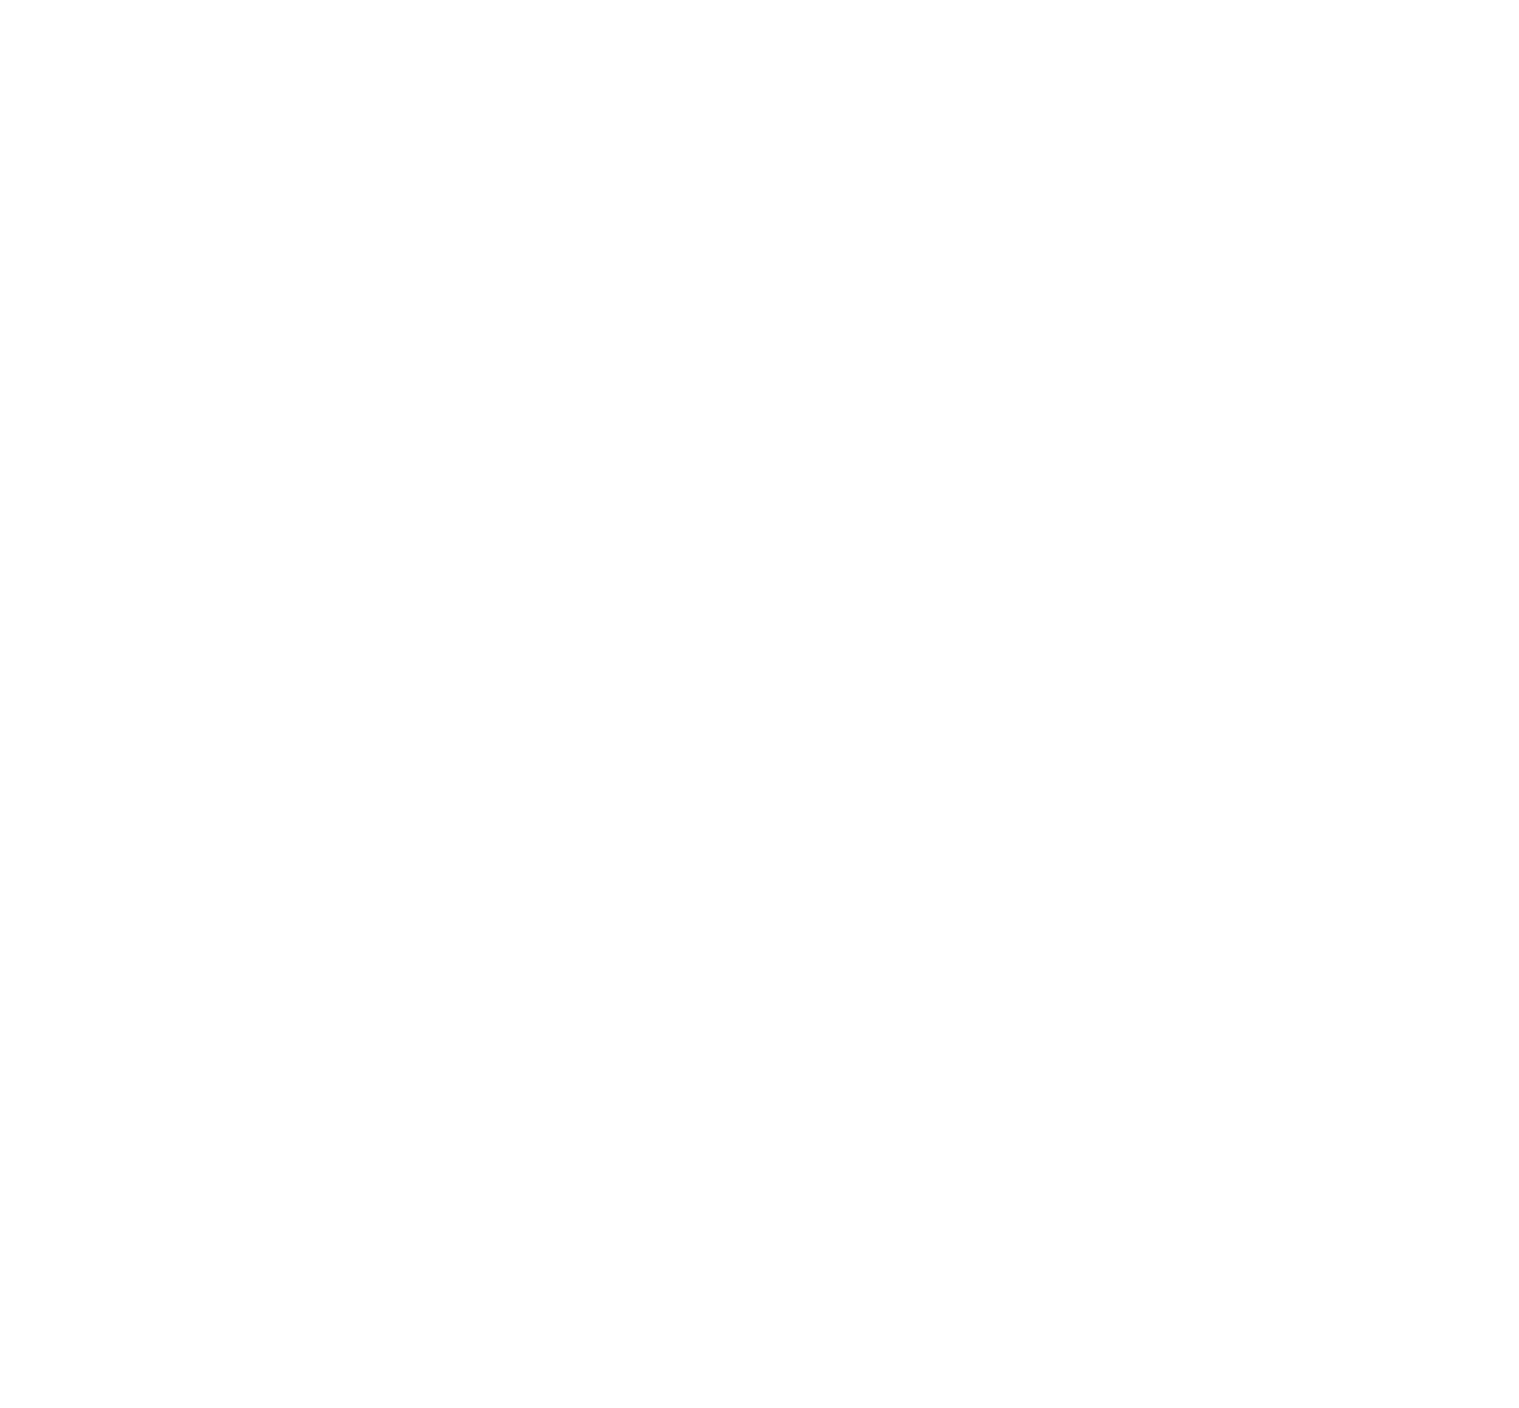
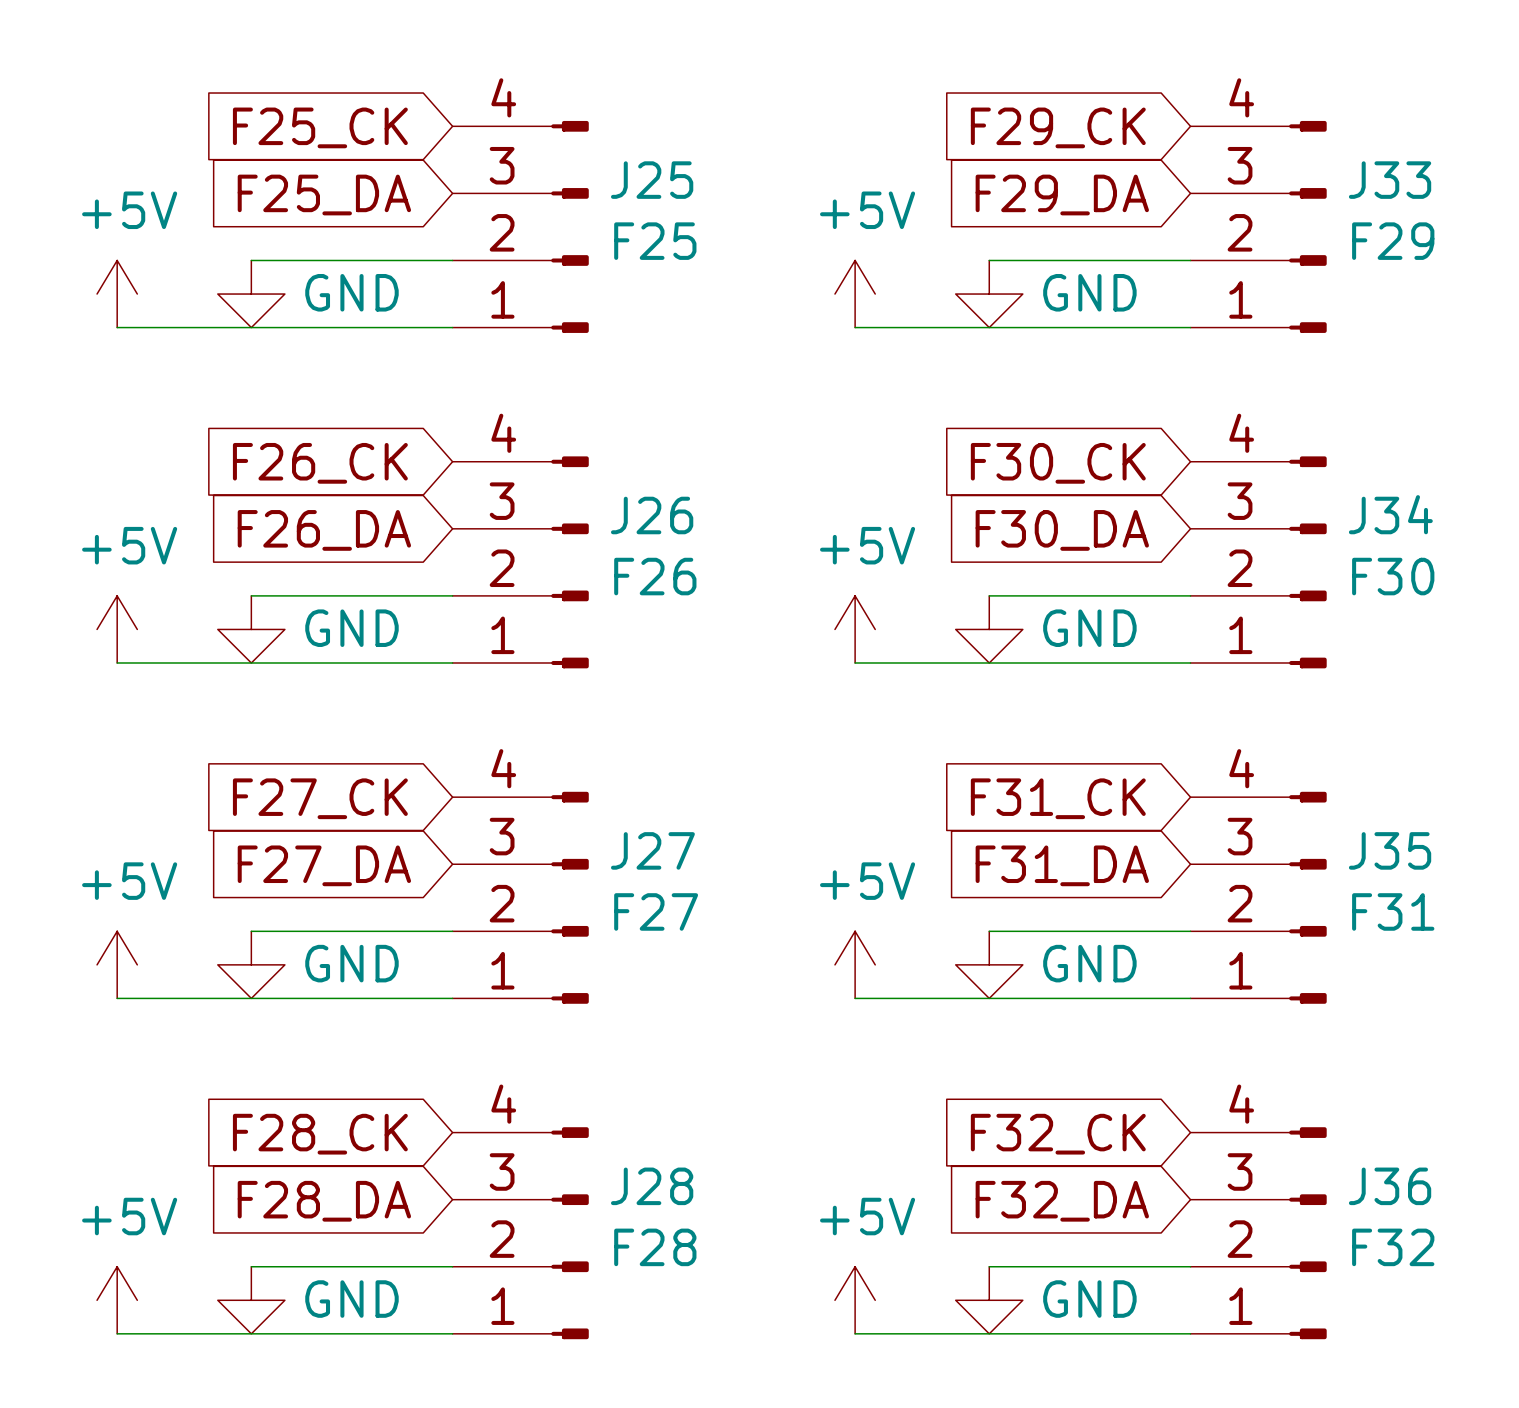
global label: none -> F25_CK (320, 127)
global label: none -> F29_CK (1058, 127)
global label: none -> F25_DA (324, 195)
global label: none -> F29_DA (1062, 195)
J25: none -> F25 (520, 226)
J33: none -> F29 (1258, 226)
wire: none -> (251, 260) (452, 260)
wire: none -> (989, 260) (1190, 260)
power symbol: none -> +5V (117, 294)
power symbol: none -> GND (251, 294)
power symbol: none -> +5V (855, 294)
power symbol: none -> GND (989, 294)
wire: none -> (117, 327) (452, 327)
wire: none -> (855, 327) (1190, 327)
global label: none -> F26_CK (320, 463)
global label: none -> F30_CK (1058, 463)
global label: none -> F26_DA (324, 530)
global label: none -> F30_DA (1062, 530)
J26: none -> F26 (520, 562)
J34: none -> F30 (1258, 562)
wire: none -> (251, 595) (452, 595)
wire: none -> (989, 595) (1190, 595)
power symbol: none -> +5V (117, 629)
power symbol: none -> GND (251, 629)
power symbol: none -> +5V (855, 629)
power symbol: none -> GND (989, 629)
wire: none -> (117, 662) (452, 662)
wire: none -> (855, 662) (1190, 662)
global label: none -> F27_CK (320, 798)
global label: none -> F31_CK (1058, 798)
global label: none -> F27_DA (324, 865)
global label: none -> F31_DA (1062, 865)
J27: none -> F27 (520, 897)
J35: none -> F31 (1258, 897)
wire: none -> (251, 931) (452, 931)
wire: none -> (989, 931) (1190, 931)
power symbol: none -> +5V (117, 964)
power symbol: none -> GND (251, 964)
power symbol: none -> +5V (855, 964)
power symbol: none -> GND (989, 964)
wire: none -> (117, 998) (452, 998)
wire: none -> (855, 998) (1190, 998)
global label: none -> F28_CK (320, 1134)
global label: none -> F32_CK (1058, 1134)
global label: none -> F28_DA (324, 1201)
global label: none -> F32_DA (1062, 1201)
J28: none -> F28 (520, 1233)
J36: none -> F32 (1258, 1233)
wire: none -> (251, 1266) (452, 1266)
wire: none -> (989, 1266) (1190, 1266)
power symbol: none -> +5V (117, 1300)
power symbol: none -> GND (251, 1300)
power symbol: none -> +5V (855, 1300)
power symbol: none -> GND (989, 1300)
wire: none -> (117, 1333) (452, 1333)
wire: none -> (855, 1333) (1190, 1333)

